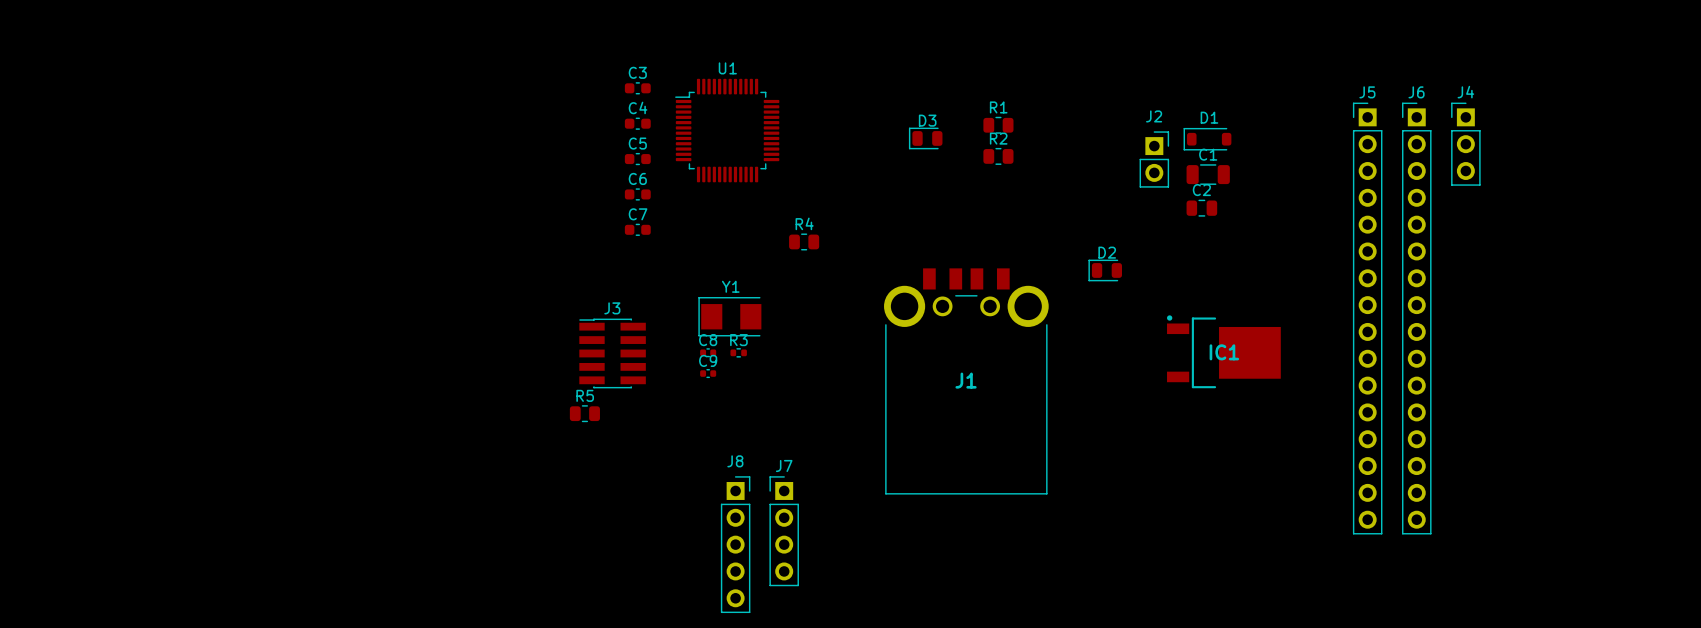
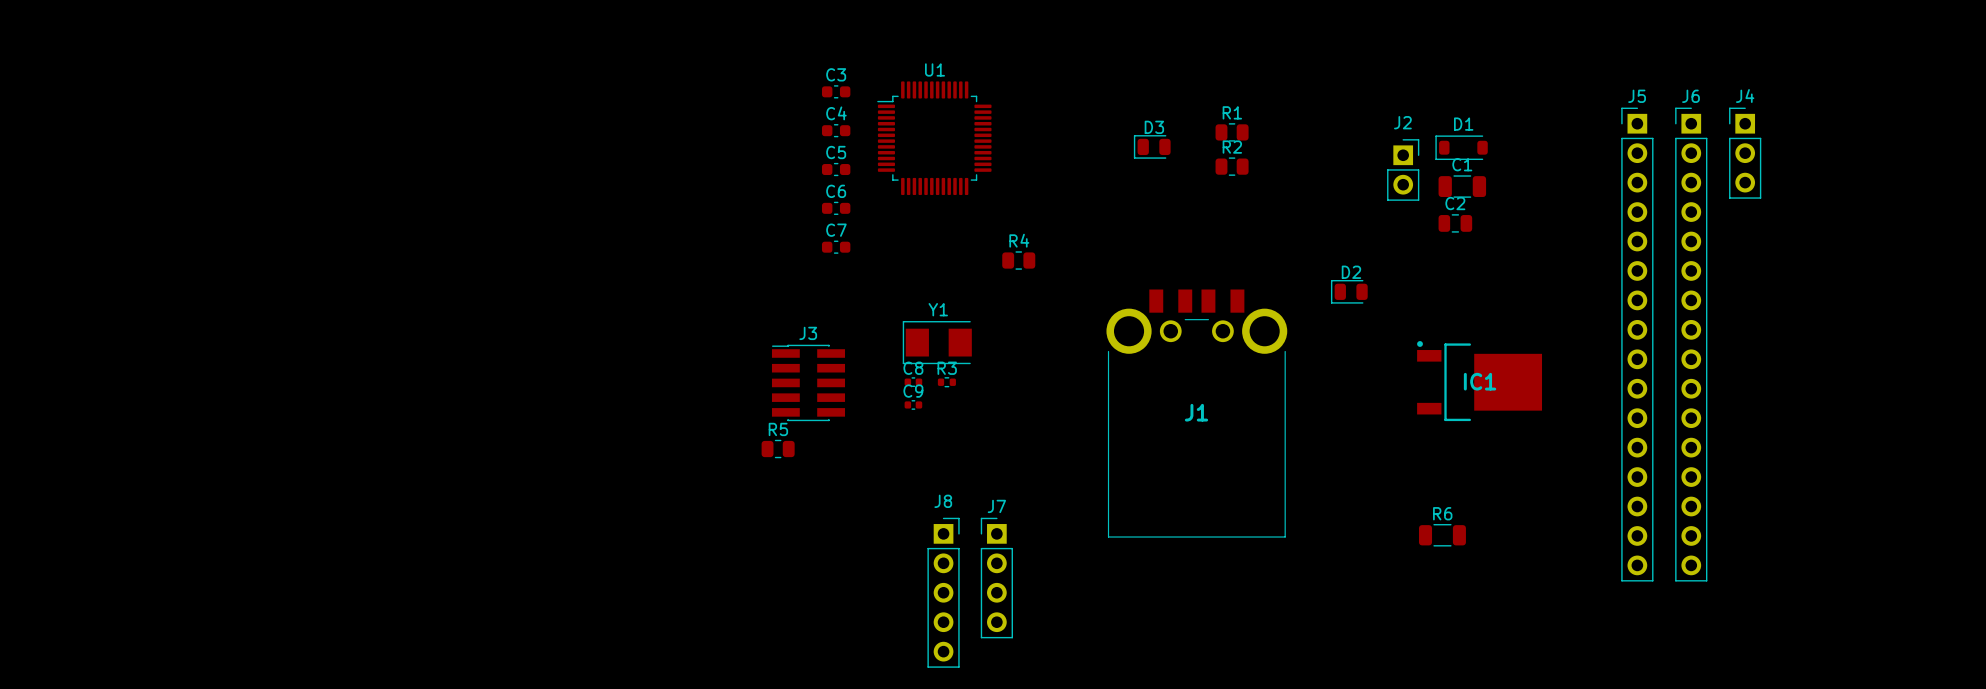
R6: none -> (1442, 535)

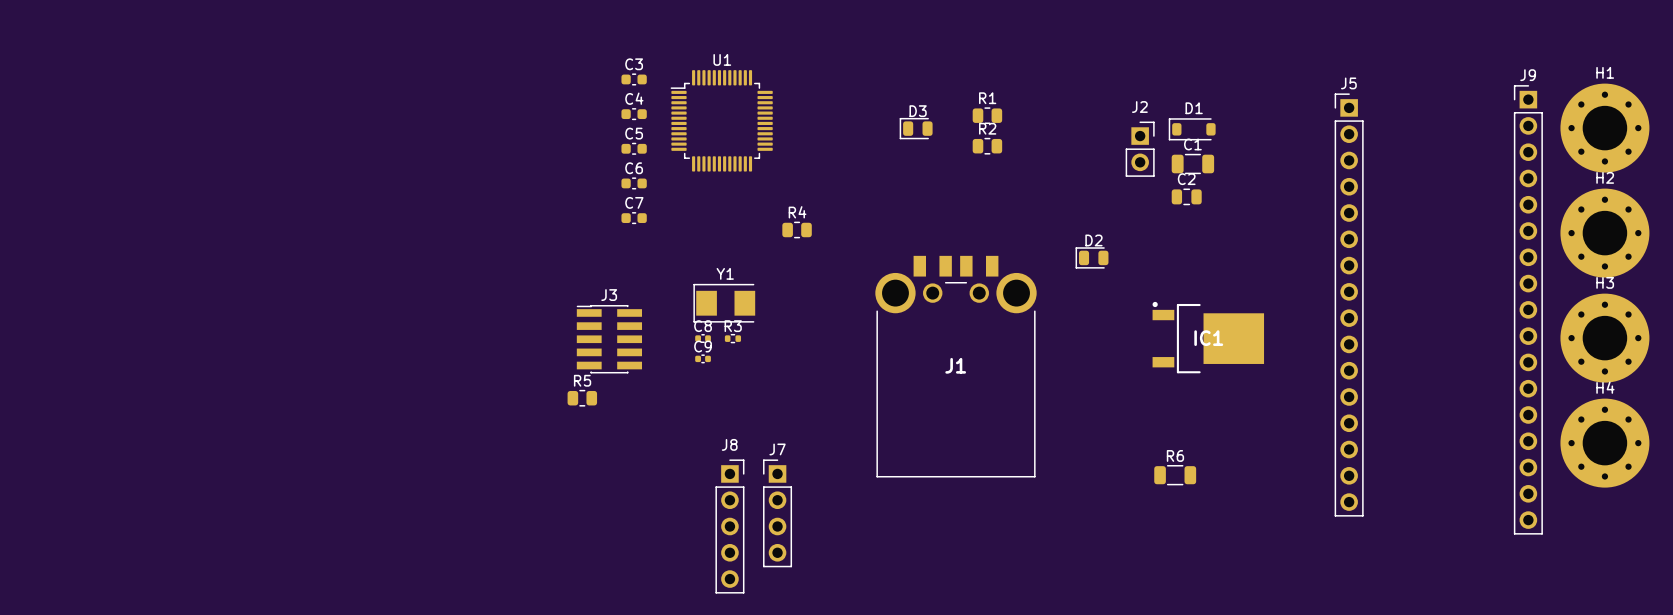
H1: none -> (1604, 128)
J4: (1745, 153) -> none
H2: none -> (1604, 233)
J6: (1691, 344) -> none
J9: none -> (1528, 309)
H3: none -> (1604, 338)
H4: none -> (1604, 443)

